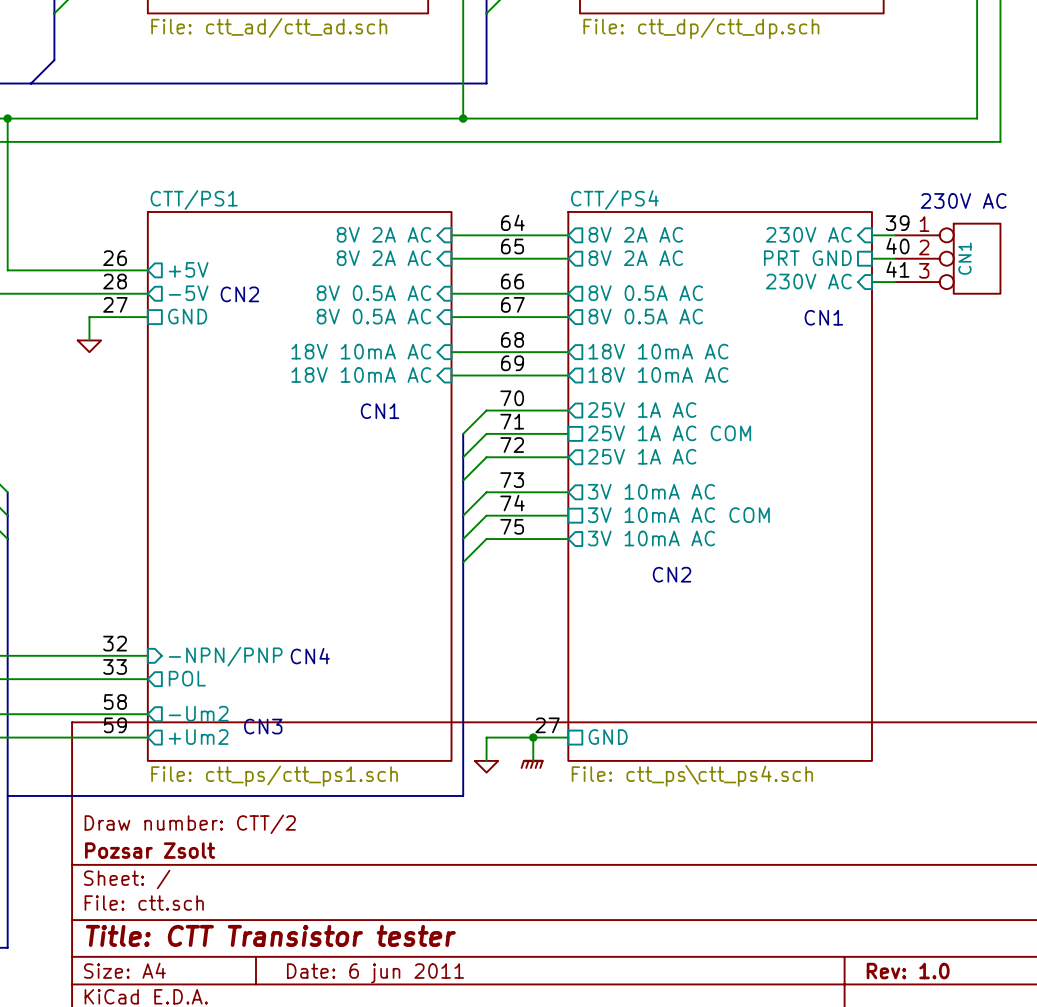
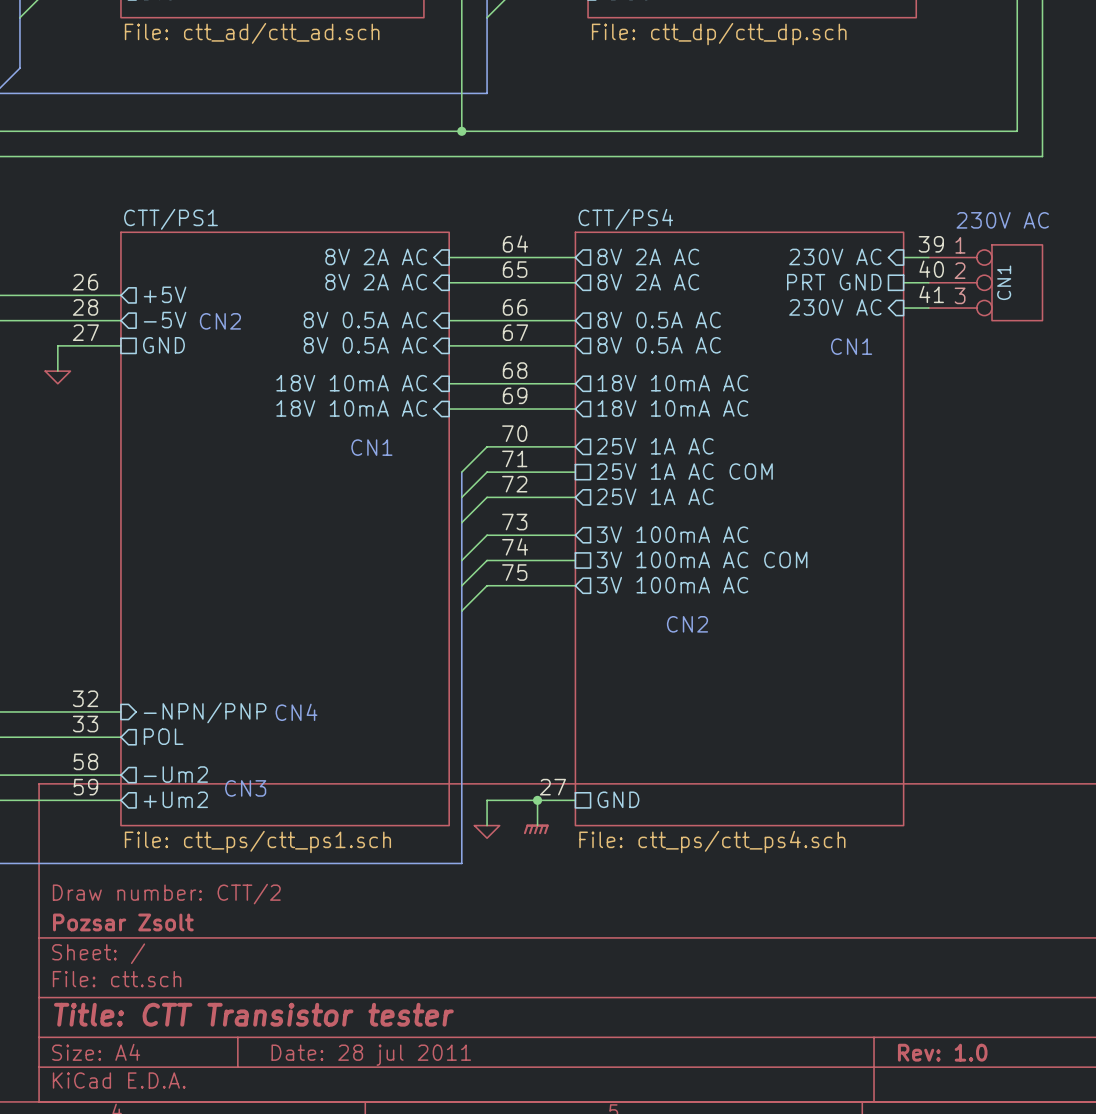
sheet pin: 3V 10mA AC (651, 491) -> 3V 100mA AC (672, 534)
sheet pin: 3V 10mA AC COM (678, 515) -> 3V 100mA AC COM (702, 559)
sheet pin: 3V 10mA AC (651, 538) -> 3V 100mA AC (672, 585)
sheet CTT/PS4 value: File: ctt_ps\ctt_ps4.sch (692, 775) -> File: ctt_ps/ctt_ps4.sch (712, 842)
title block: Date: 6 jun 2011 (375, 973) -> Date: 28 jul 2011 (371, 1055)

